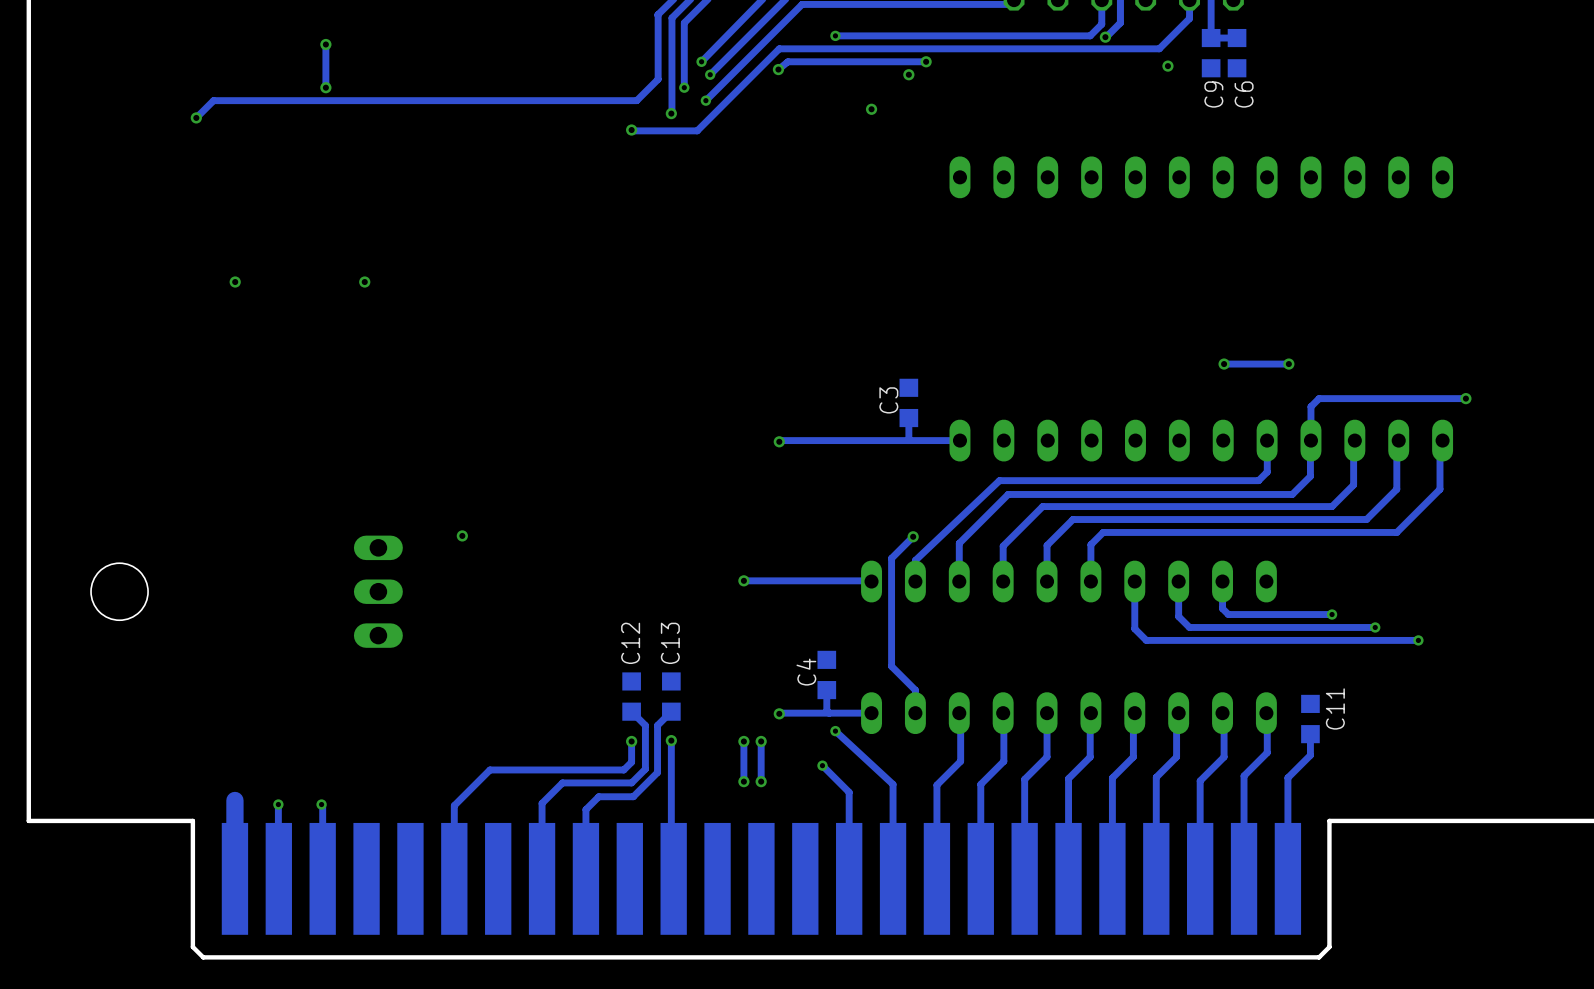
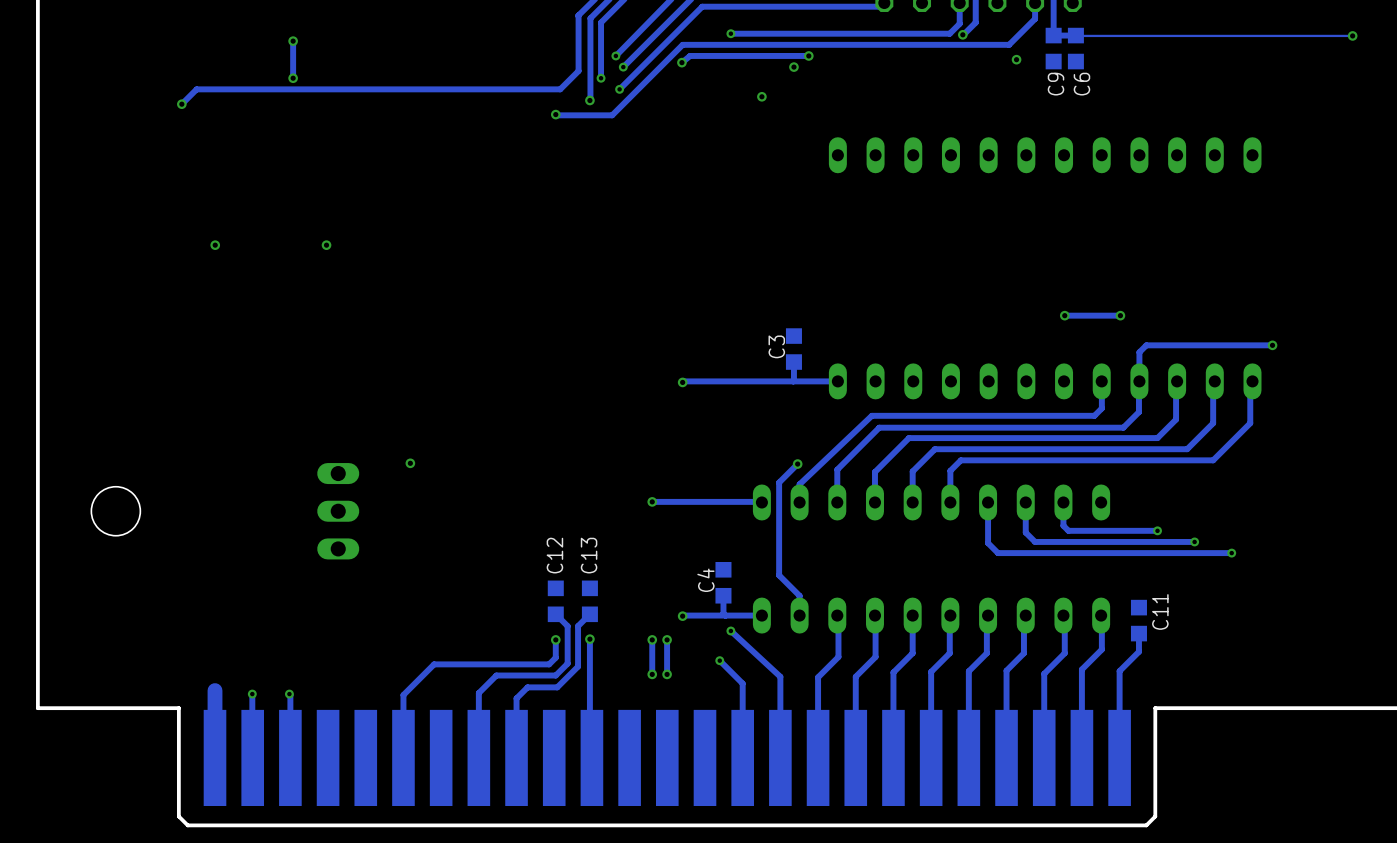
track: none -> (1075, 35) (1352, 35)
via: none -> (1352, 35)

